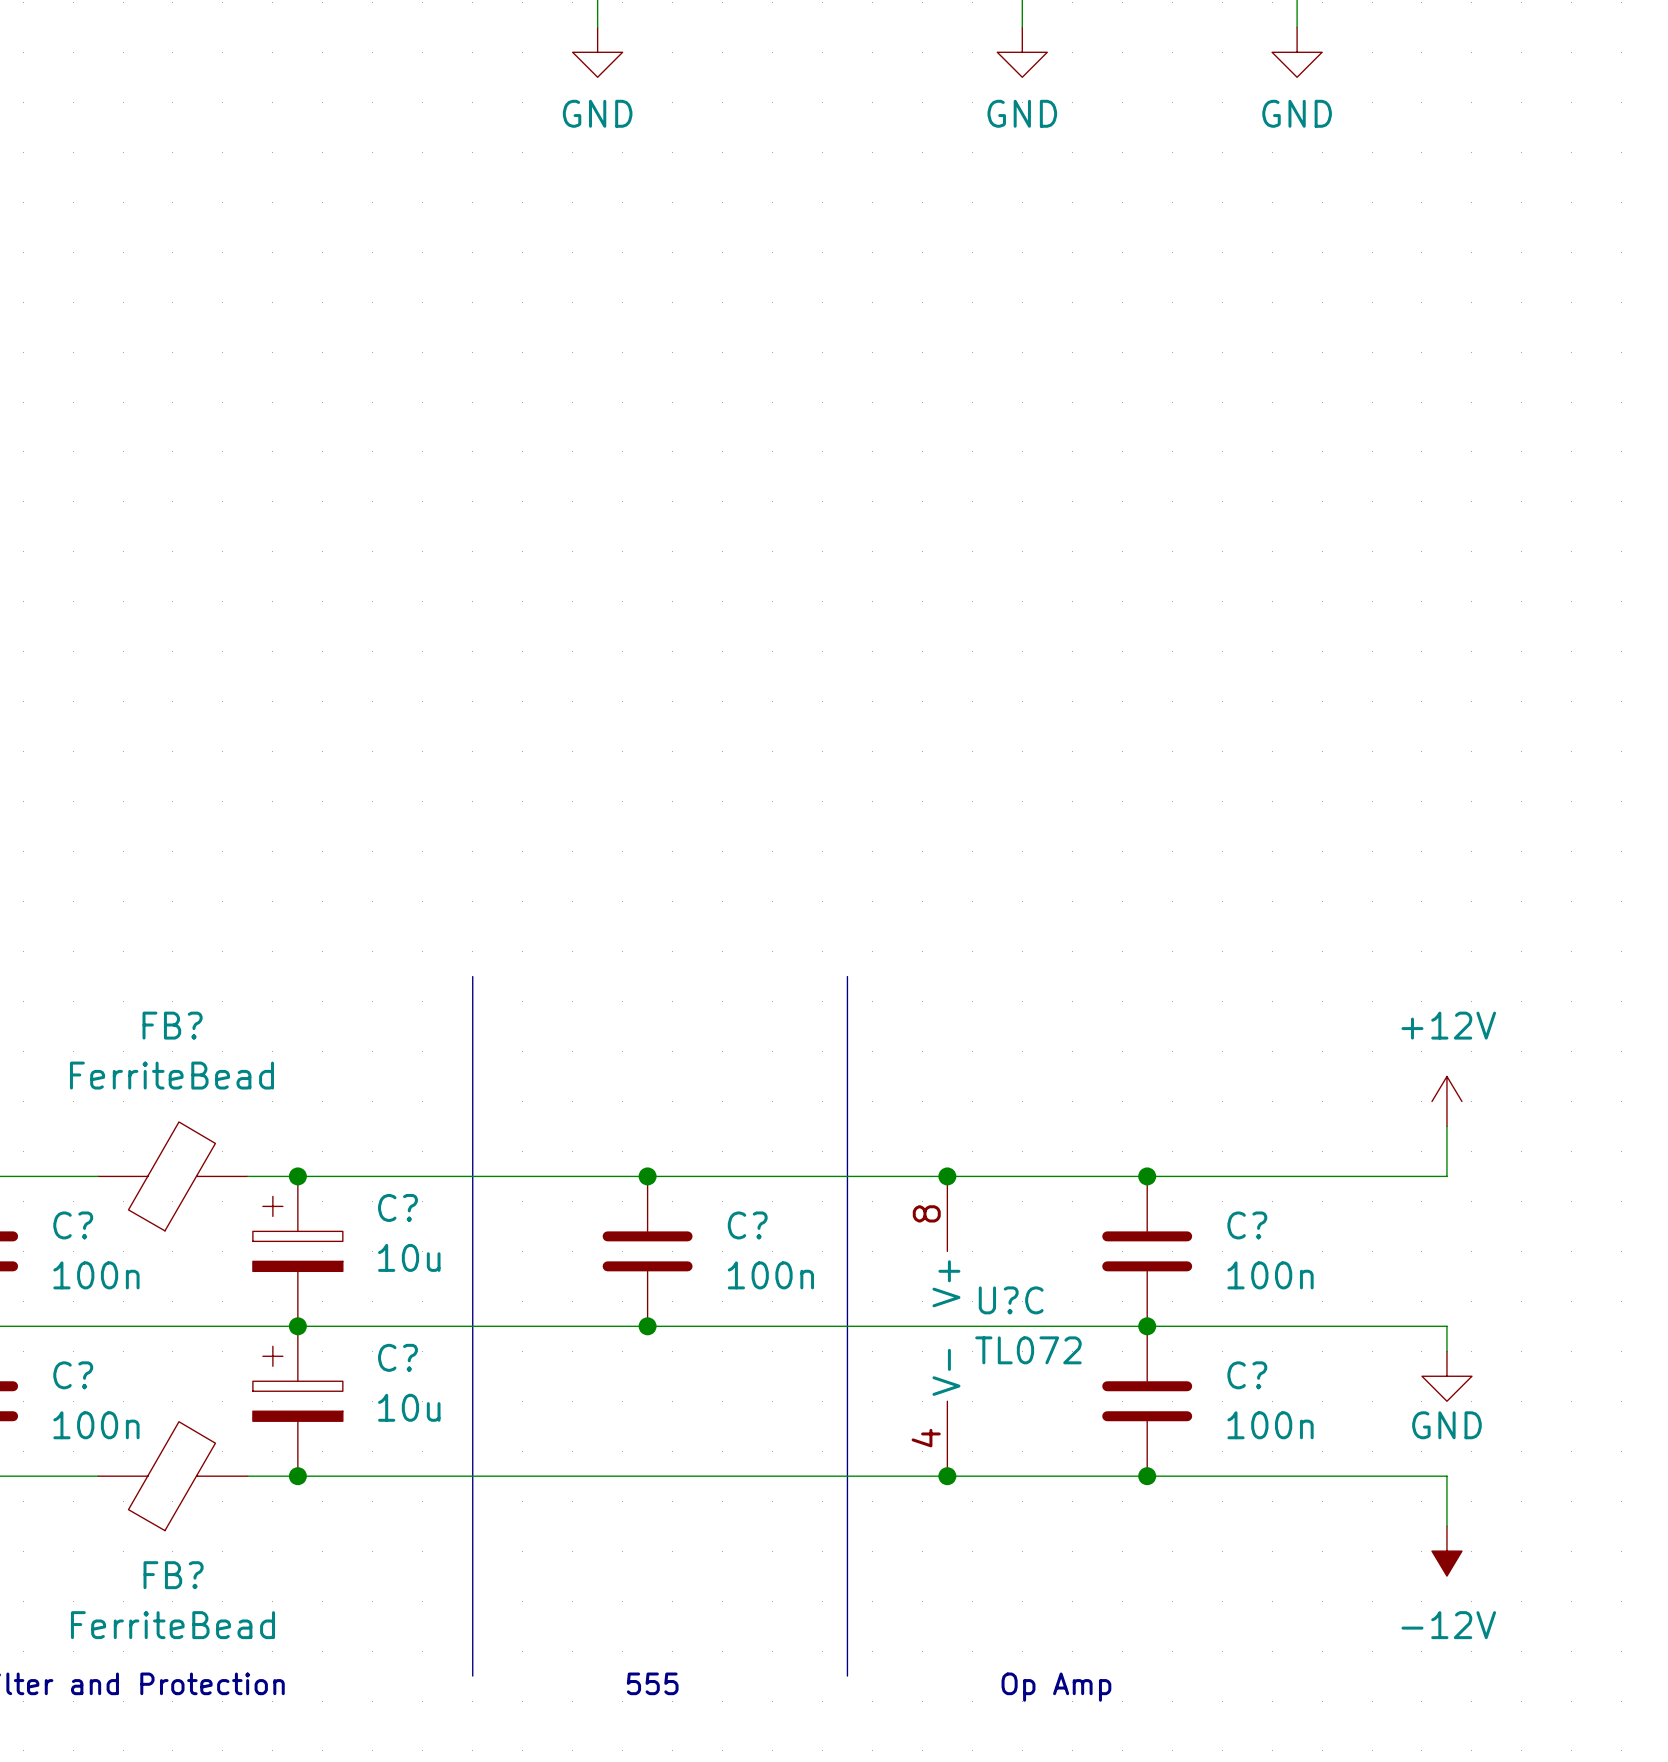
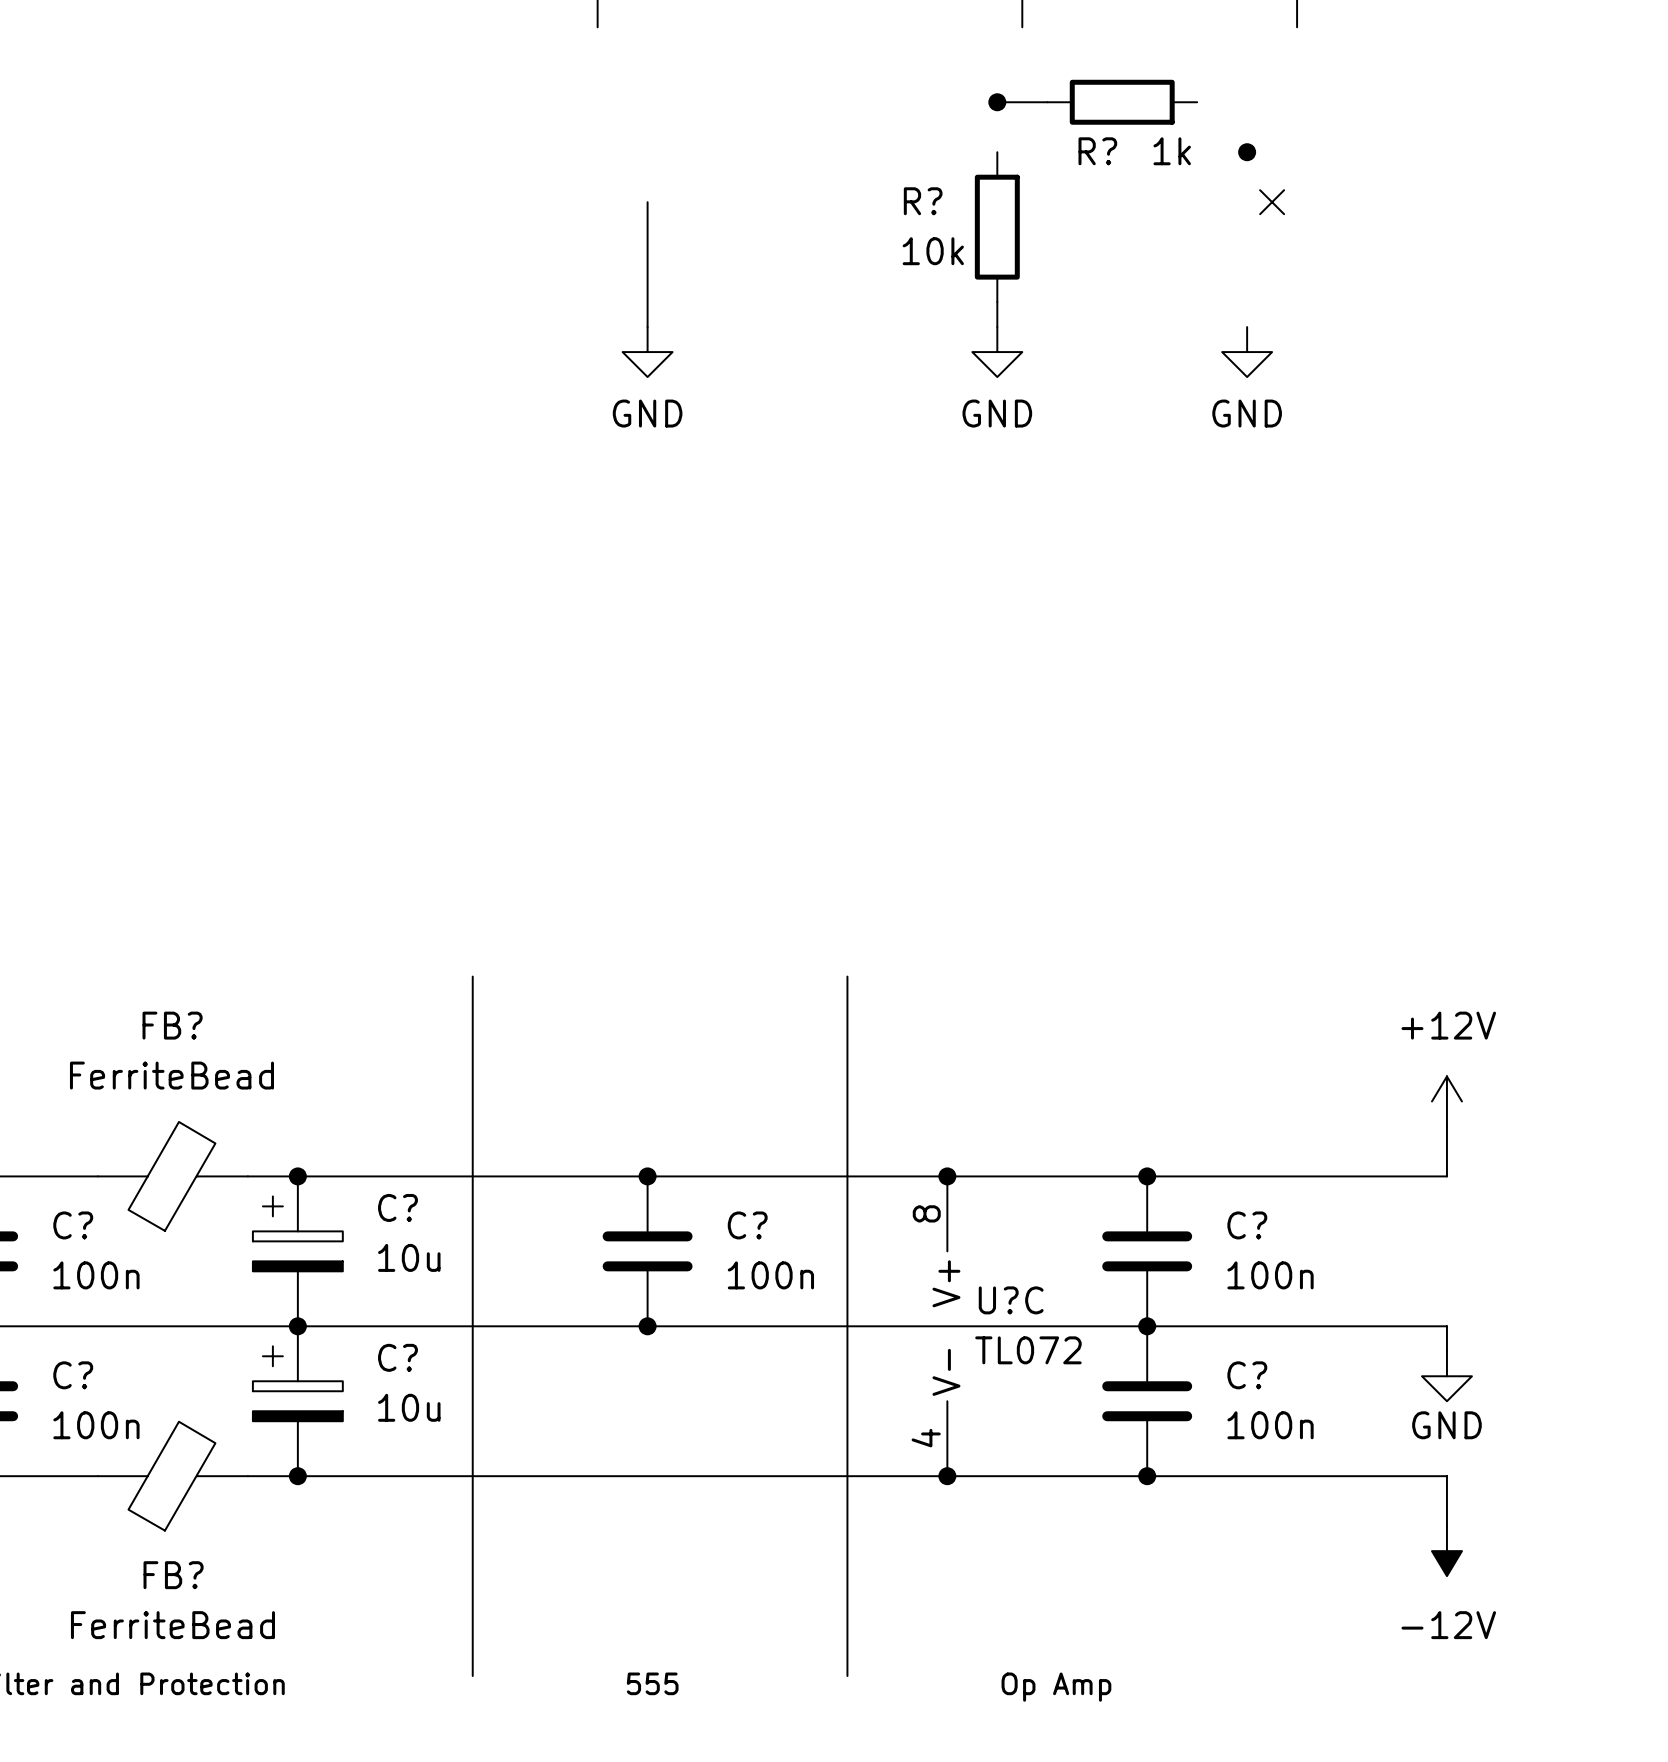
power symbol: GND (597, 52) -> none
power symbol: GND (1022, 52) -> none
power symbol: GND (1297, 52) -> none
wire: none -> (997, 102) (1047, 102)
junction: none -> (997, 102)
R?: none -> 1k (1122, 102)
junction: none -> (1247, 152)
wire: none -> (647, 202) (647, 327)
no-connect mark: none -> (1272, 202)
R?: none -> 10k (997, 227)
wire: none -> (997, 302) (997, 327)
power symbol: none -> GND (647, 352)
power symbol: none -> GND (997, 352)
power symbol: none -> GND (1247, 352)

